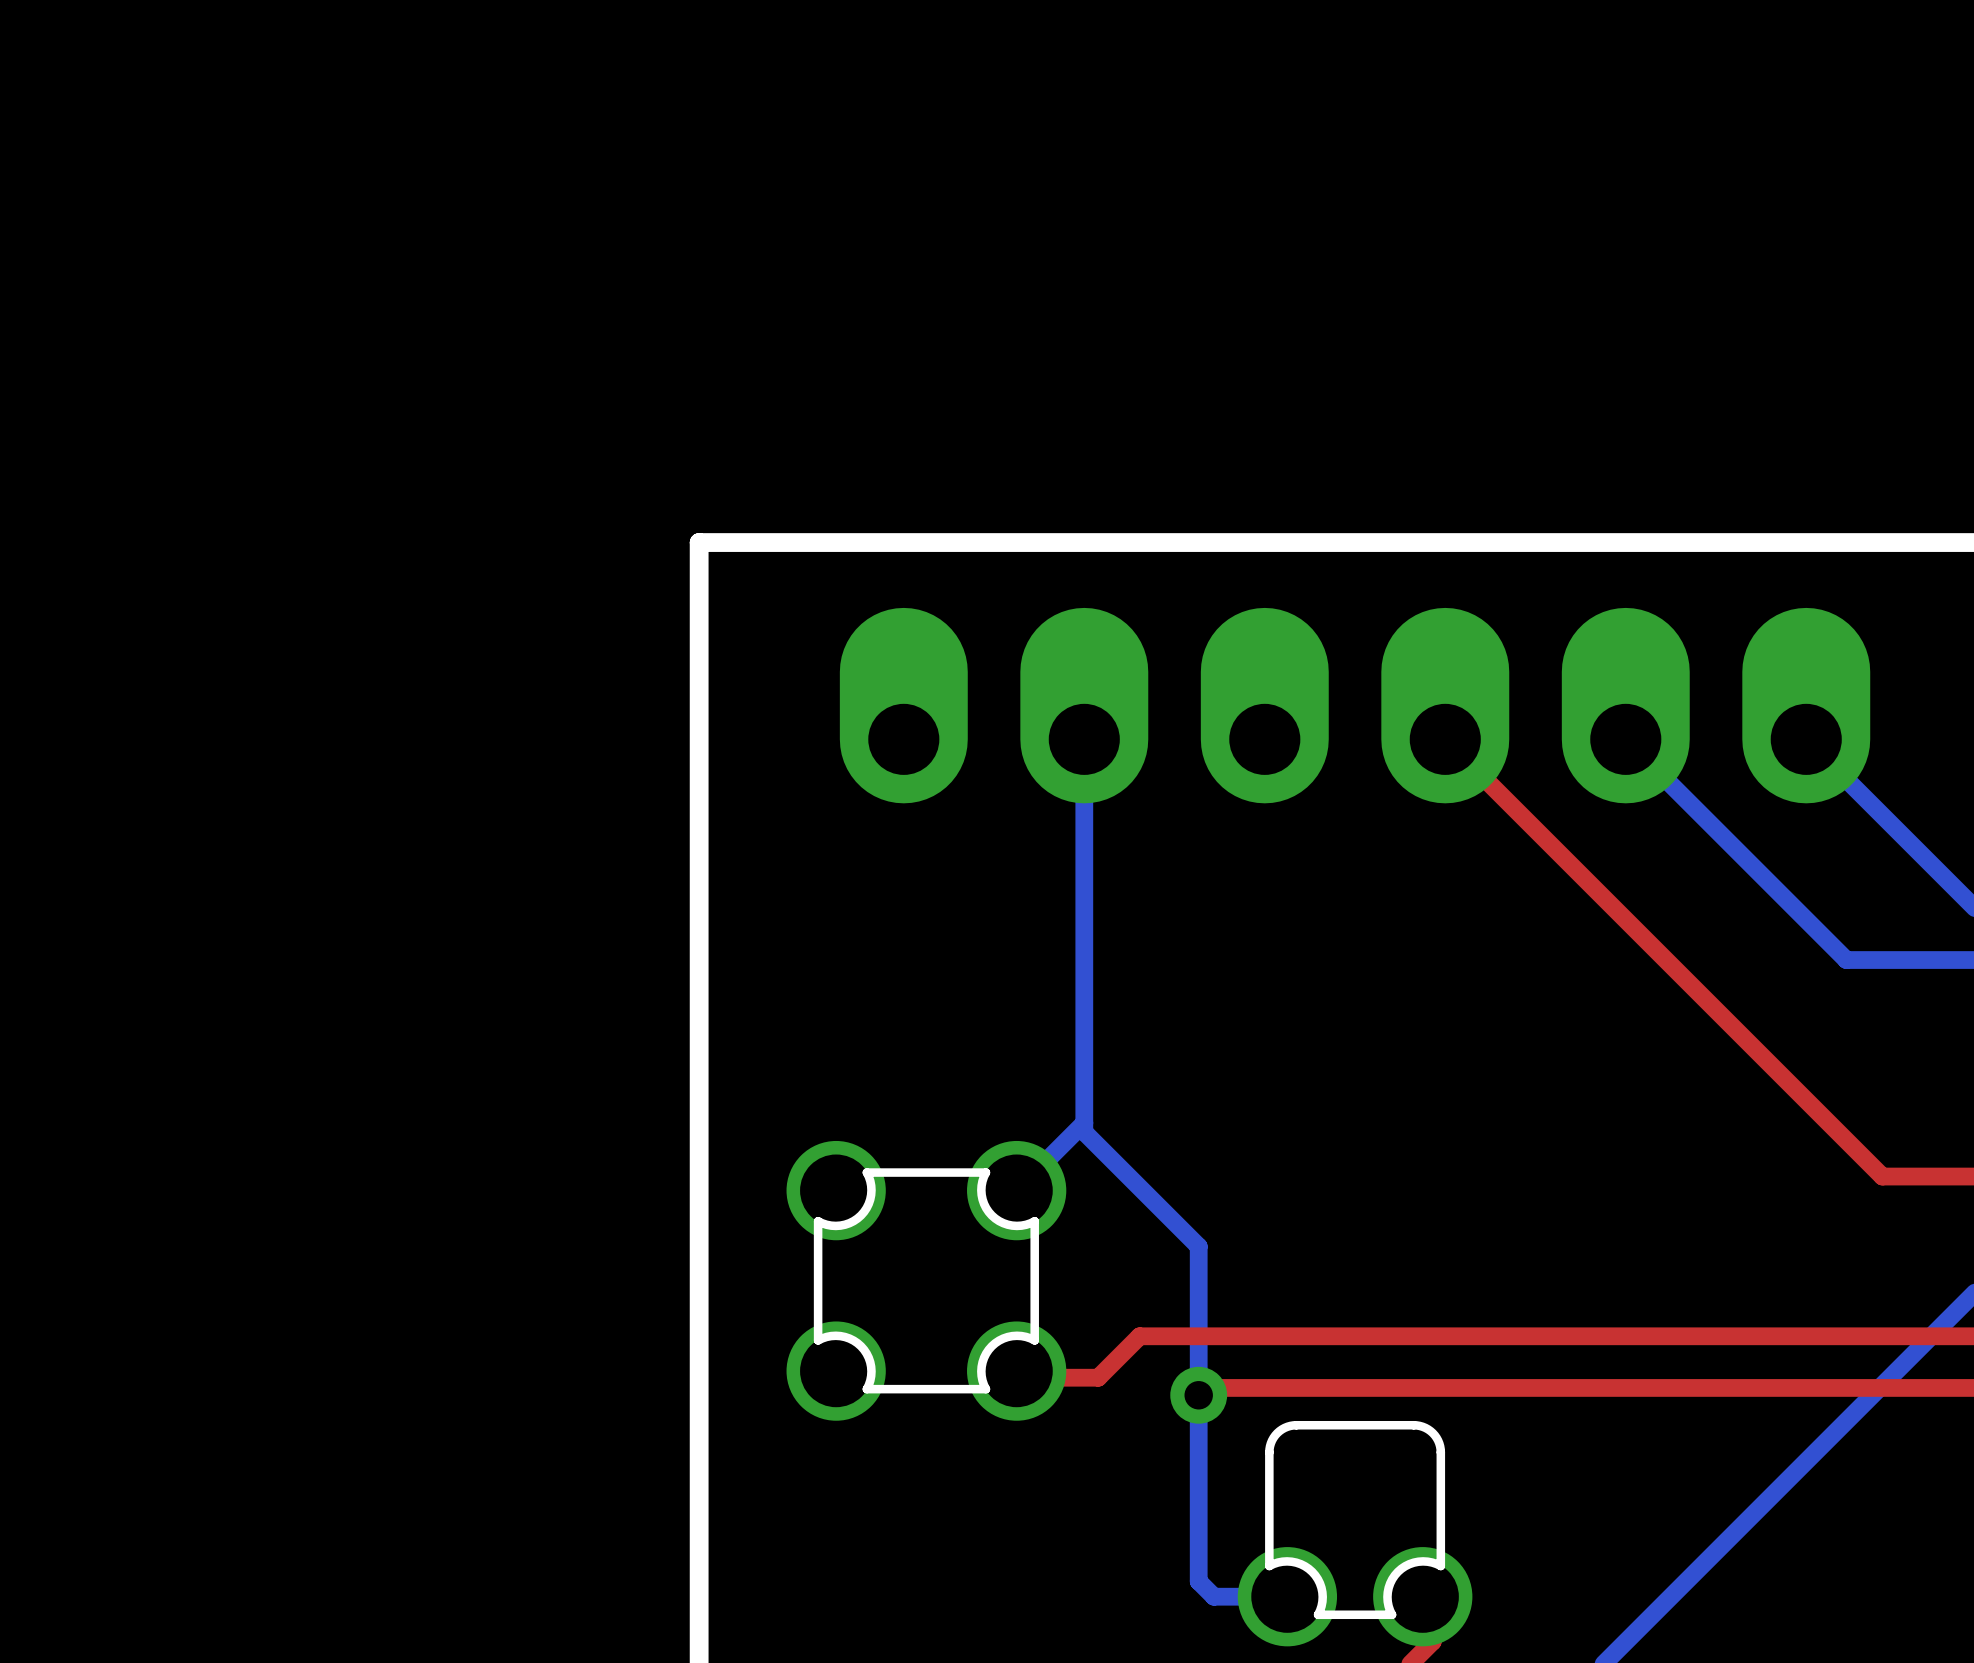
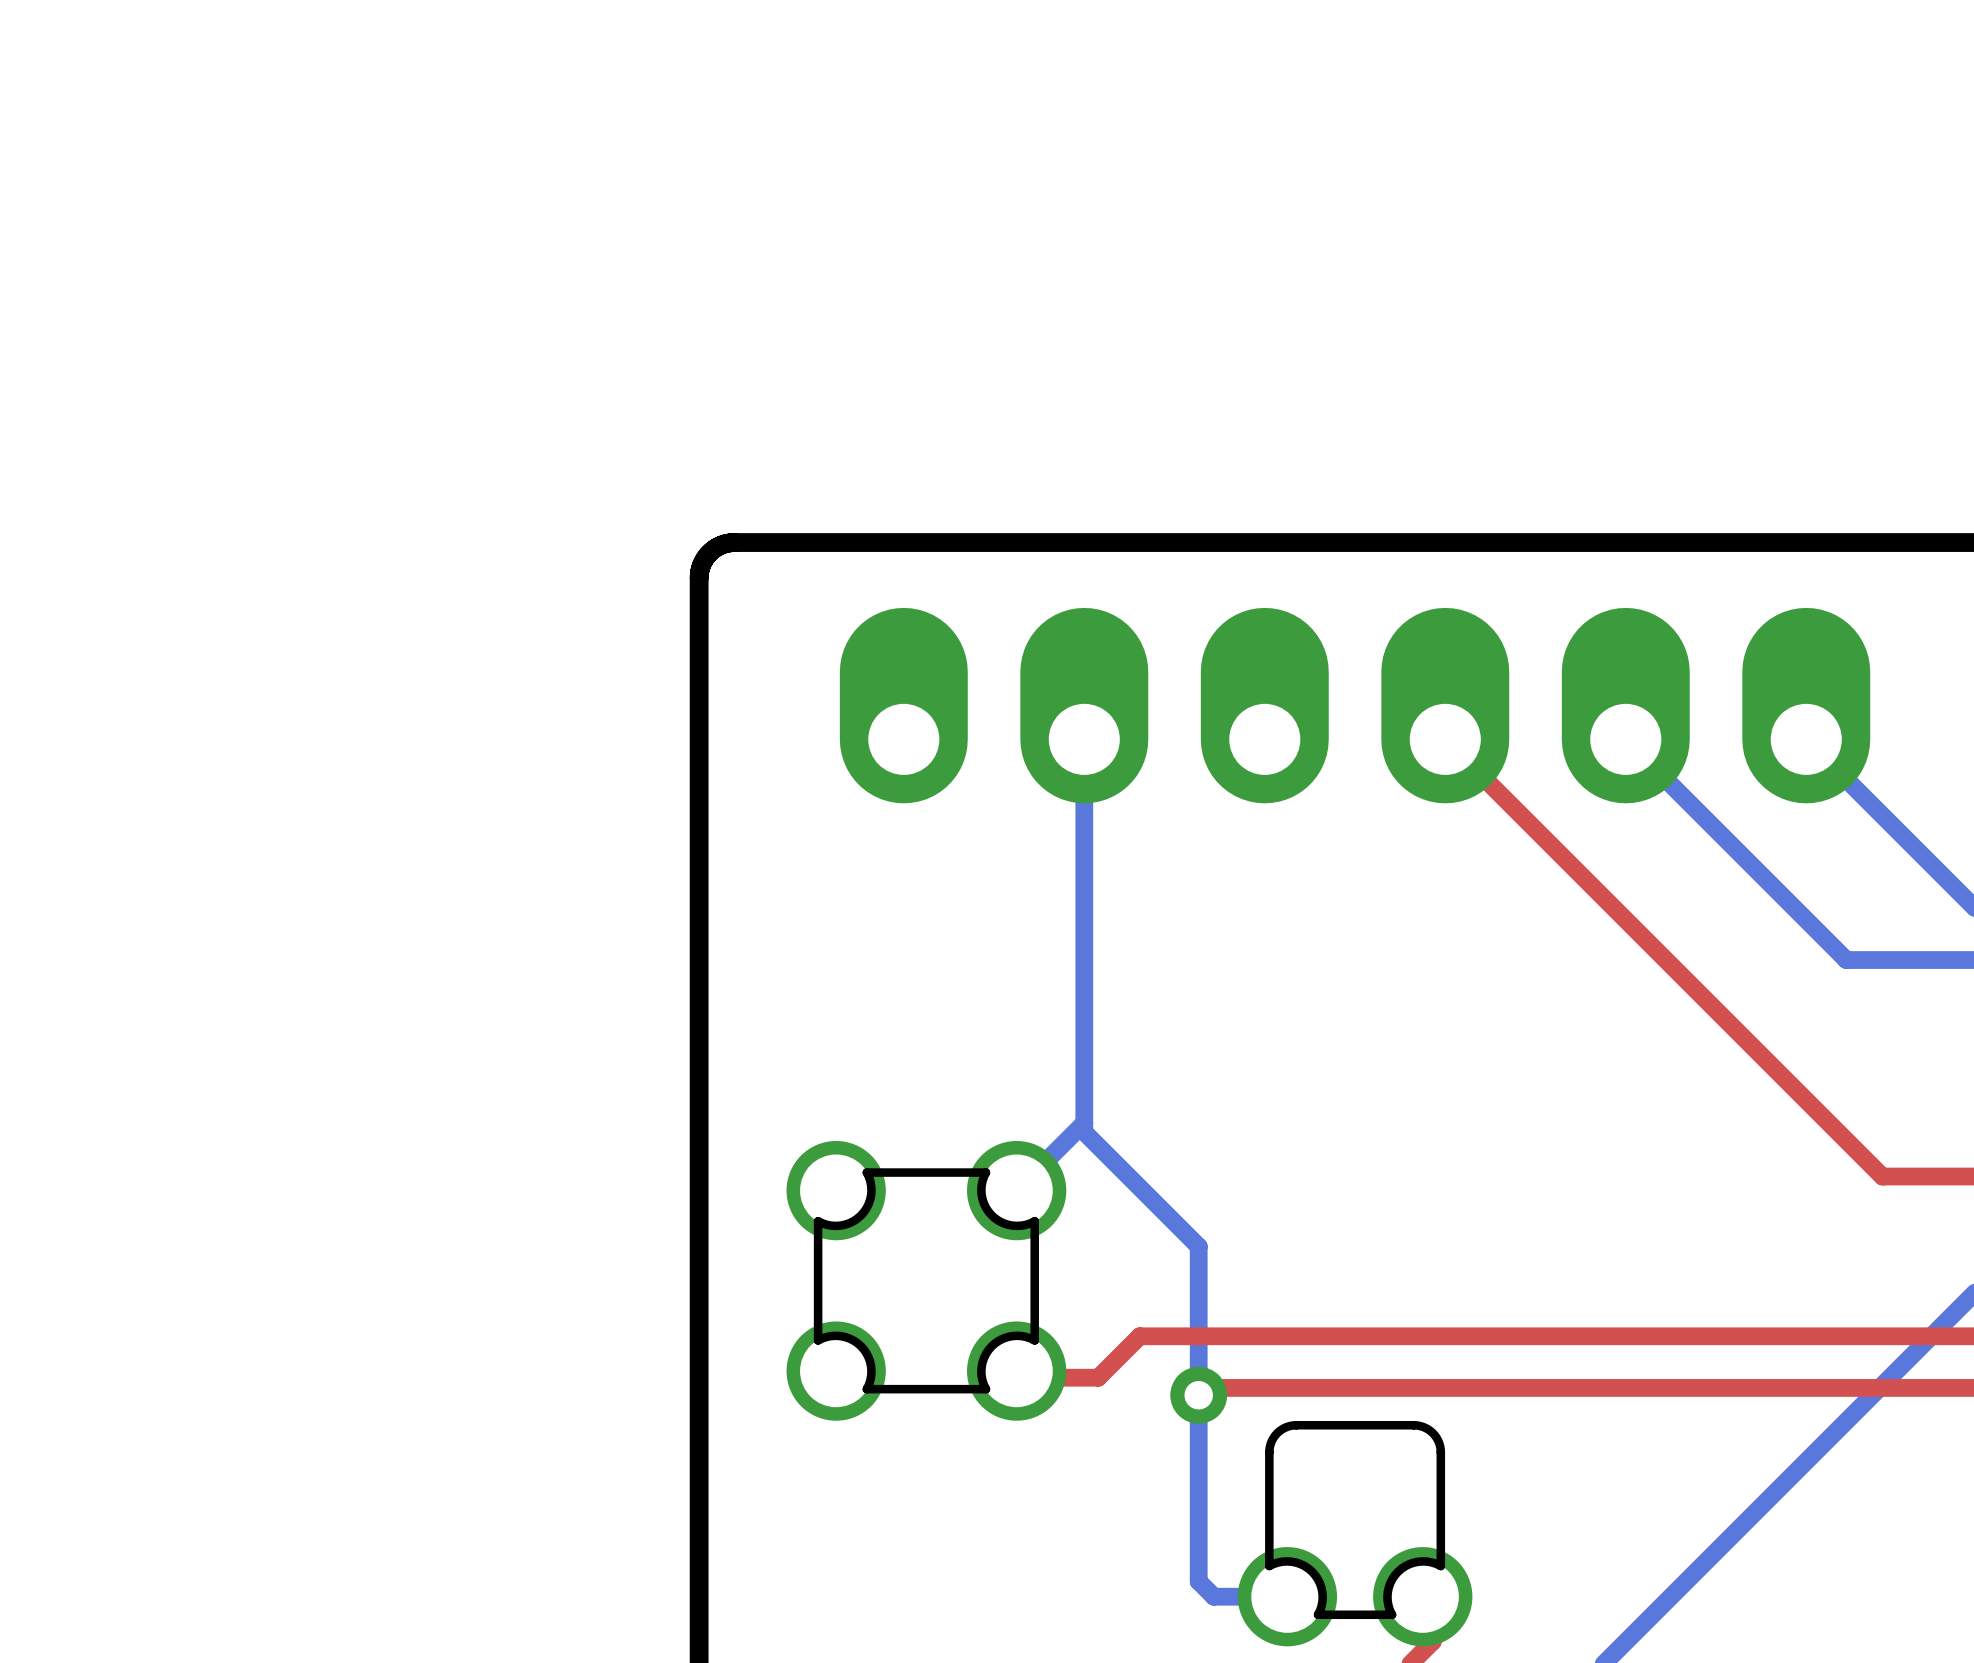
board edge: (734, 542) (699, 542) (699, 578) -> (734, 542) (720, 545) (709, 552) (701, 564) (699, 578)

